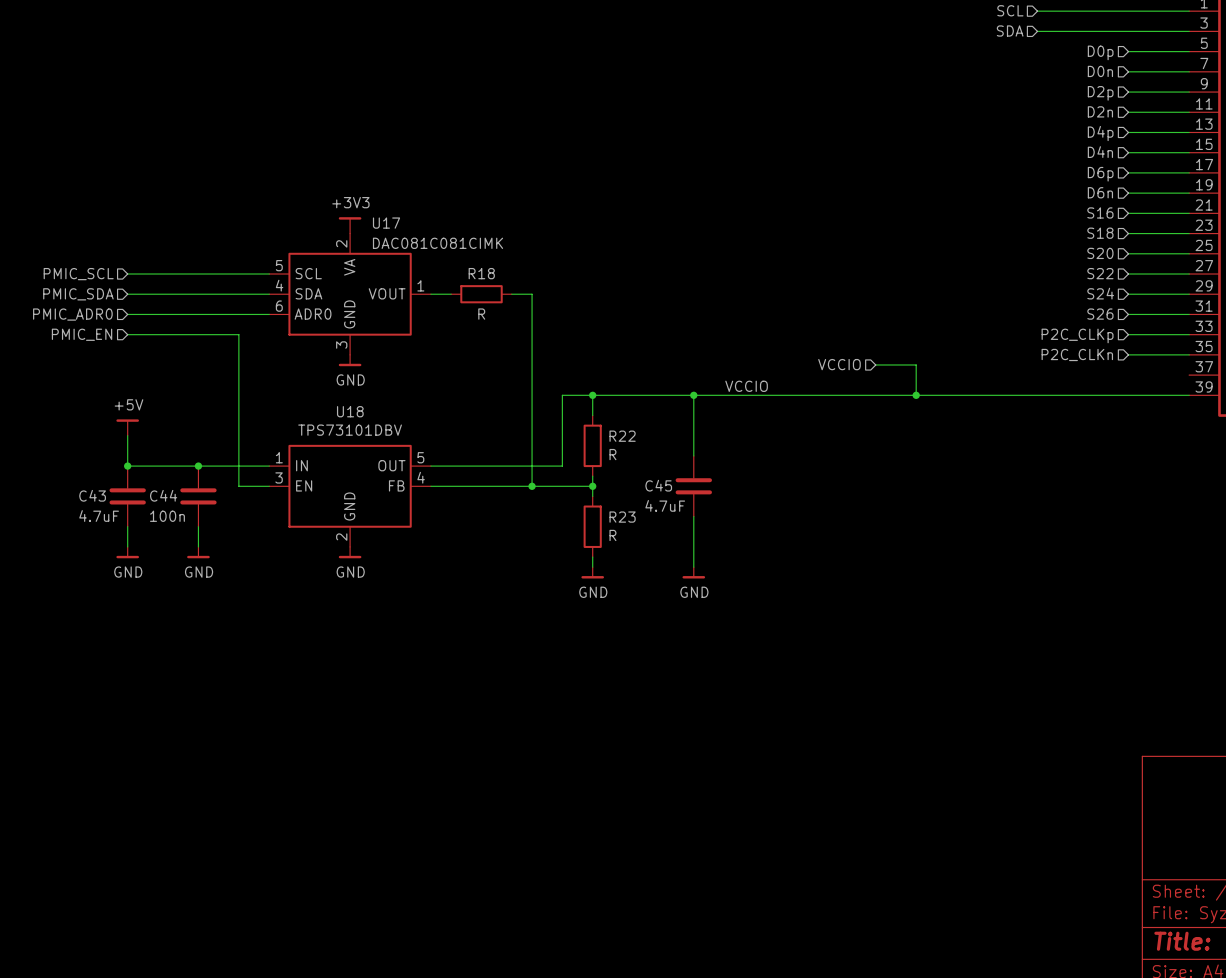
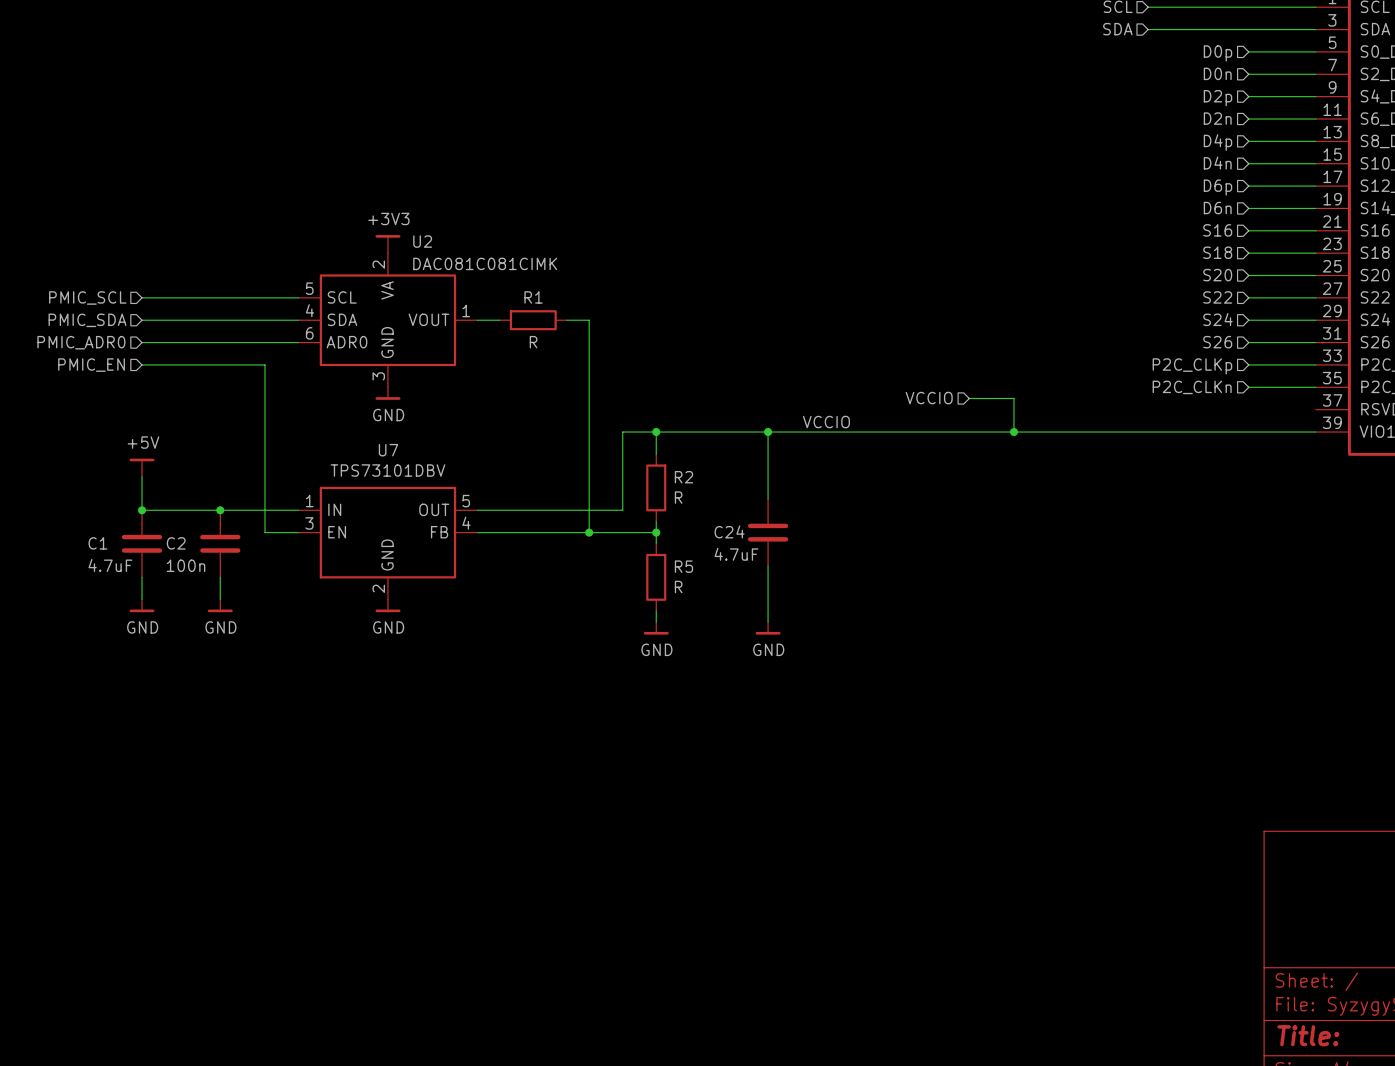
U17 name: U17 (386, 223) -> U2 (422, 241)
R18 name: R18 (481, 273) -> R1 (533, 297)
U18 name: U18 (350, 411) -> U7 (388, 450)
R22 name: R22 (622, 436) -> R2 (683, 477)
C45 name: C45 (658, 485) -> C24 (729, 531)
C43 name: C43 (92, 495) -> C1 (97, 543)
C44 name: C44 (163, 495) -> C2 (176, 543)
R23 name: R23 (622, 517) -> R5 (683, 566)

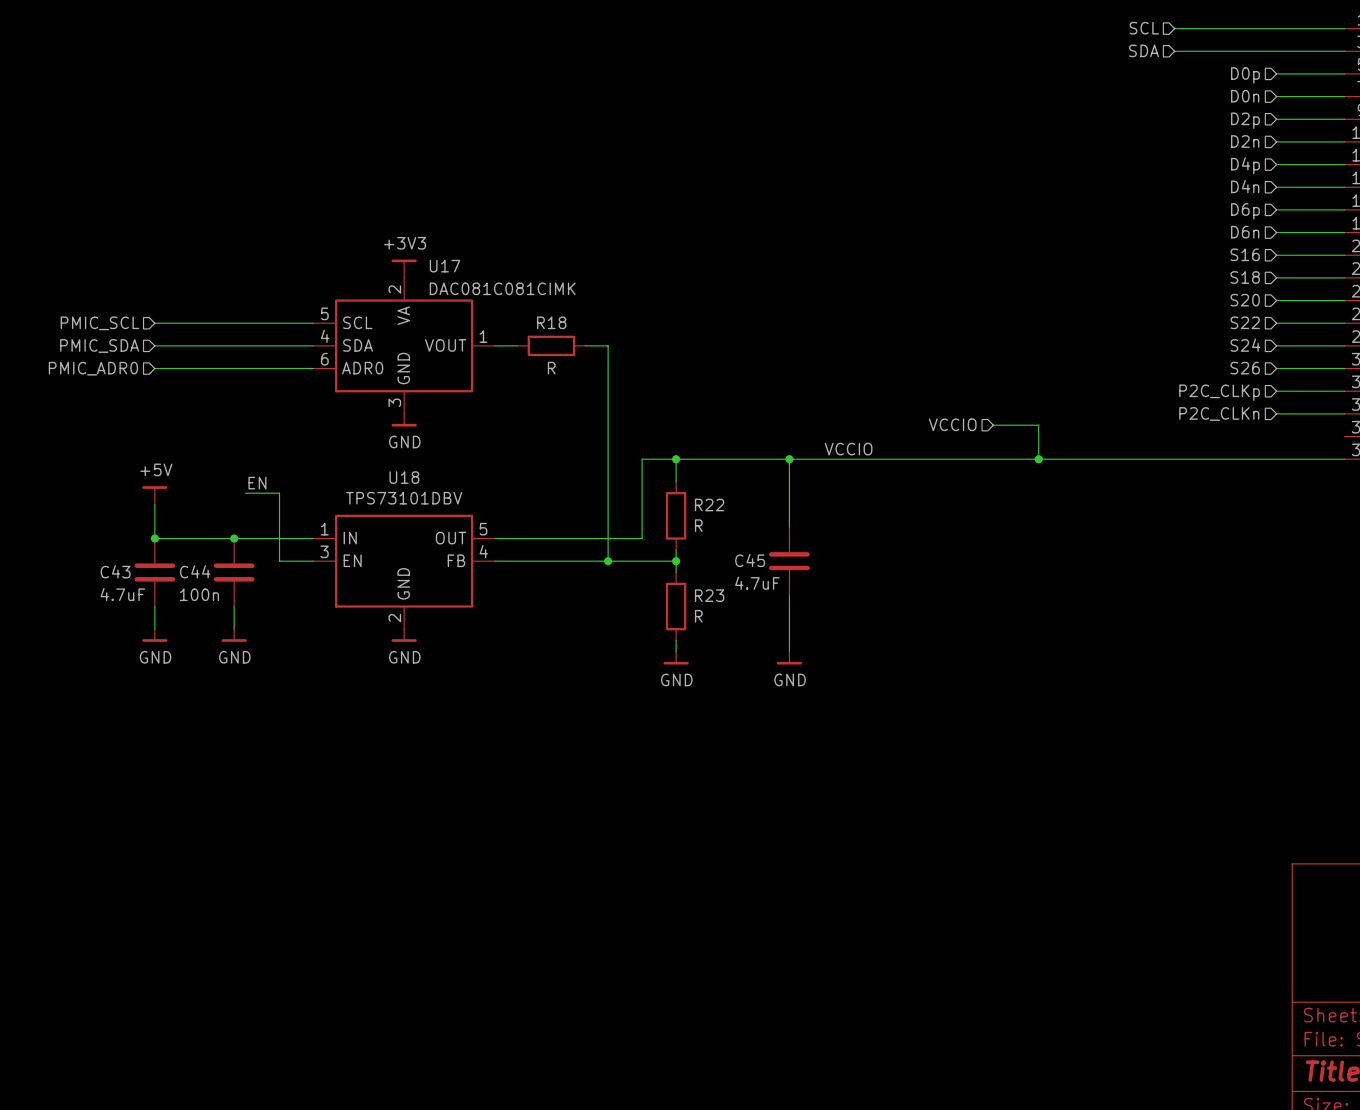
U2 name: U2 (422, 241) -> U17 (444, 266)
R1 name: R1 (533, 297) -> R18 (551, 322)
wire: (142, 364) (264, 364) (264, 465) -> (245, 493) (279, 493)
hierarchical label: PMIC_EN (91, 365) -> none
U7 name: U7 (388, 450) -> U18 (404, 477)
label: none -> EN (257, 483)
R2 name: R2 (683, 477) -> R22 (709, 505)
C24 name: C24 (729, 531) -> C45 (750, 560)
C1 name: C1 (97, 543) -> C43 (115, 571)
C2 name: C2 (176, 543) -> C44 (195, 571)
R5 name: R5 (683, 566) -> R23 (709, 595)

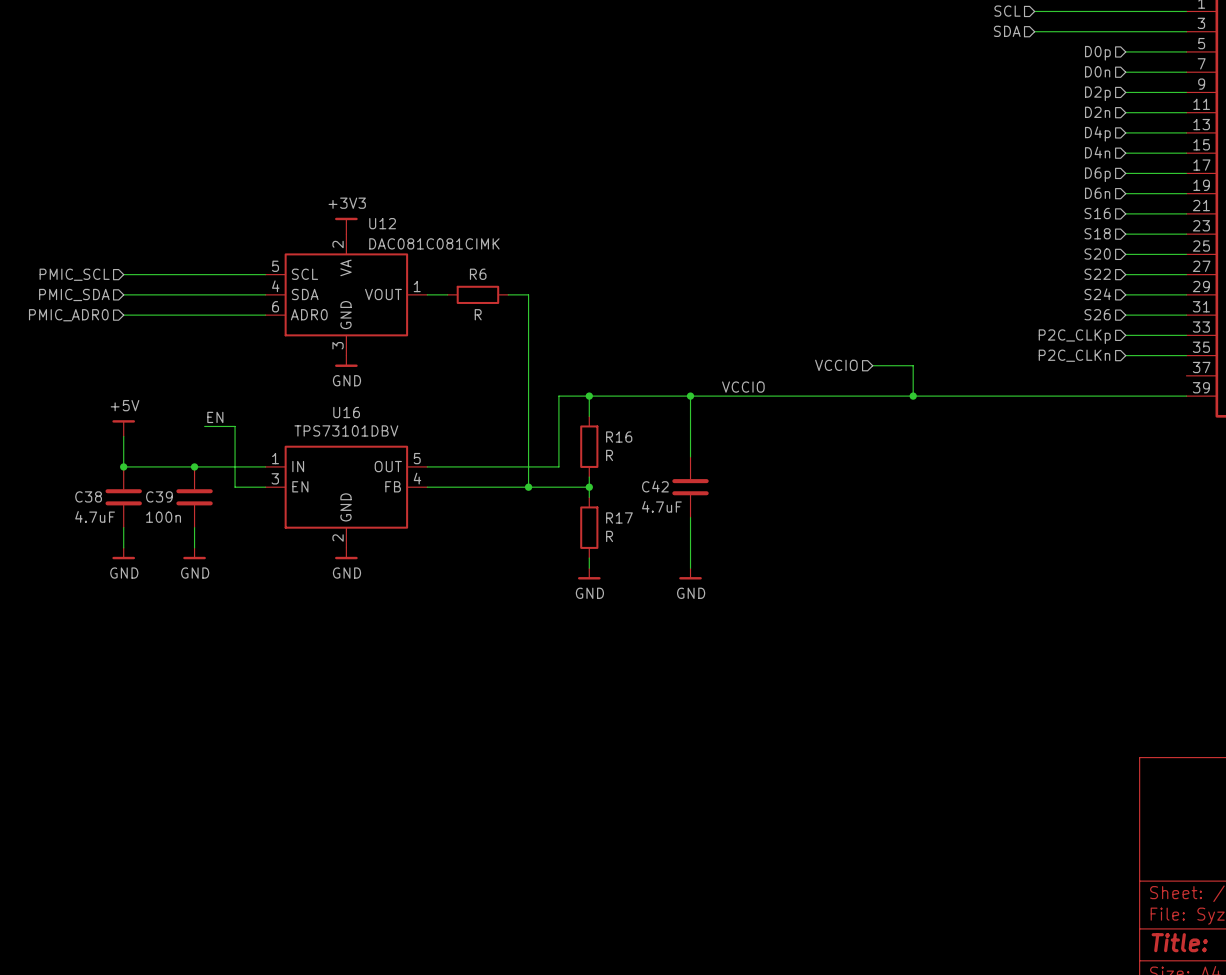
U17 name: U17 (444, 266) -> U12 (382, 223)
R18 name: R18 (551, 322) -> R6 (478, 274)
U18 name: U18 (404, 477) -> U16 (346, 412)
R22 name: R22 (709, 505) -> R16 (619, 437)
C45 name: C45 (750, 560) -> C42 (655, 486)
C43 name: C43 (115, 571) -> C38 (88, 496)
C44 name: C44 (195, 571) -> C39 (159, 496)
R23 name: R23 (709, 595) -> R17 (619, 517)

